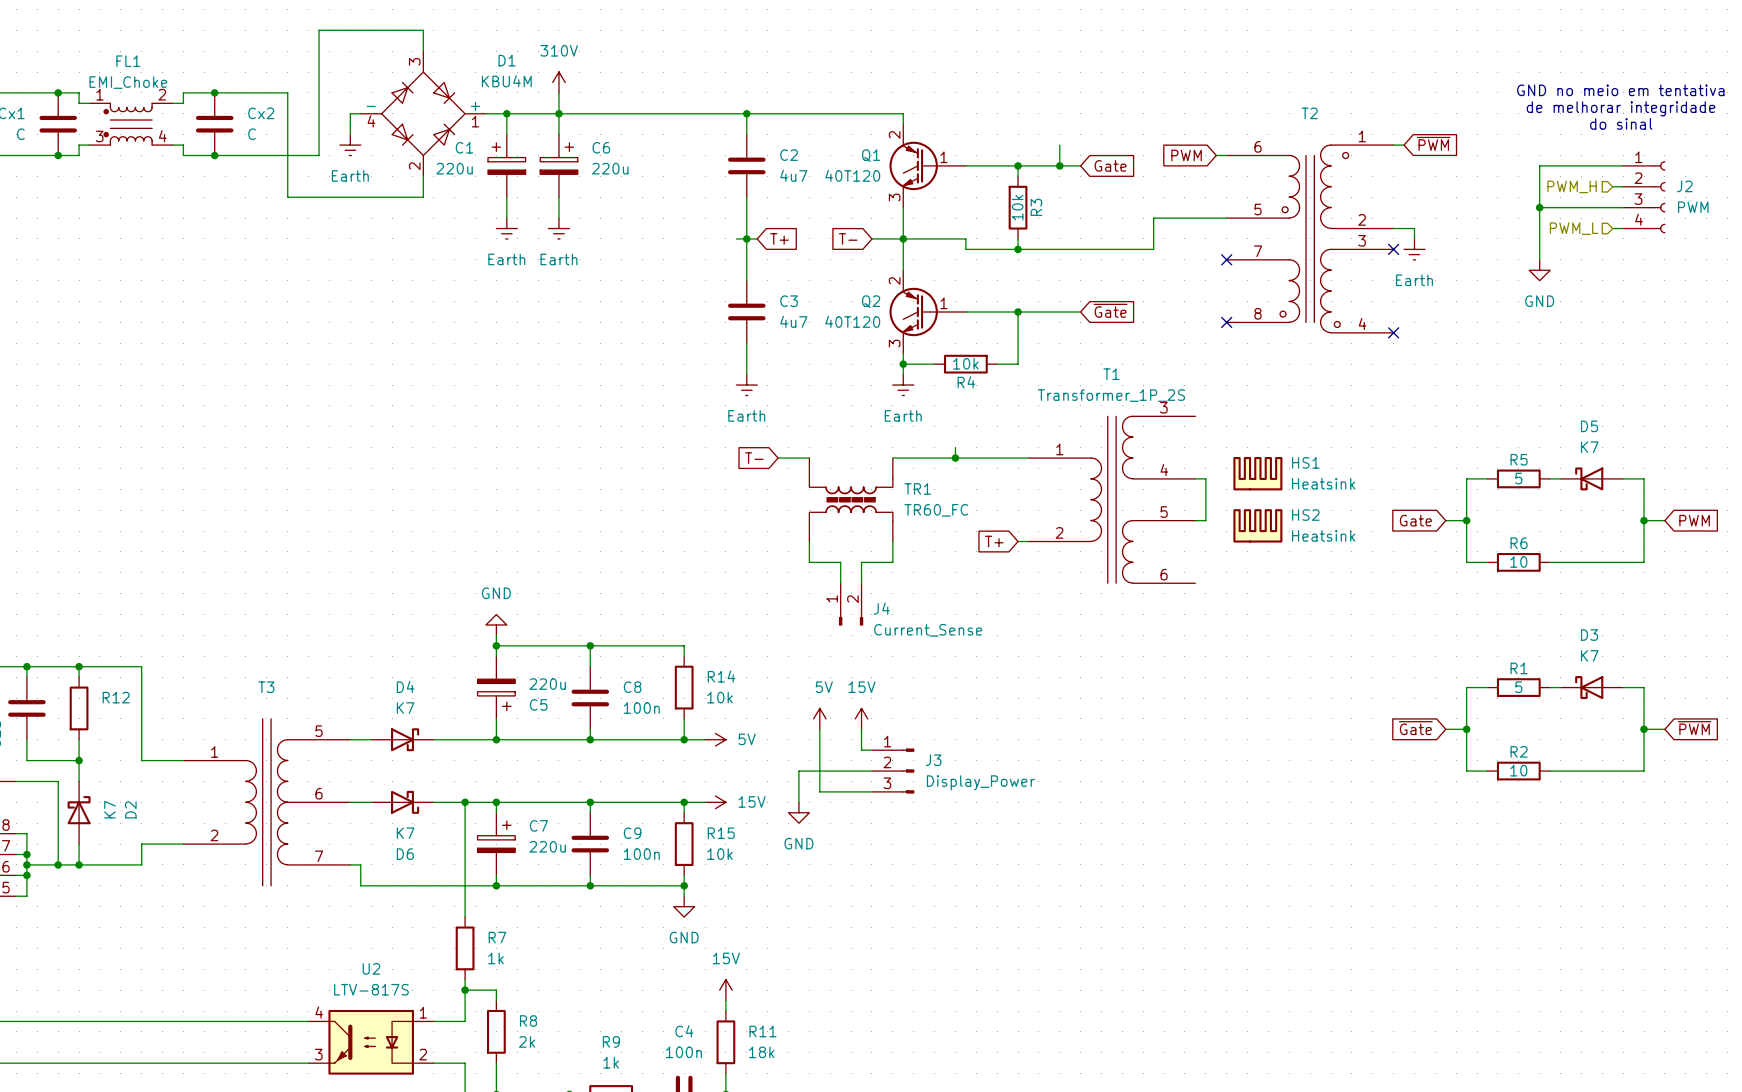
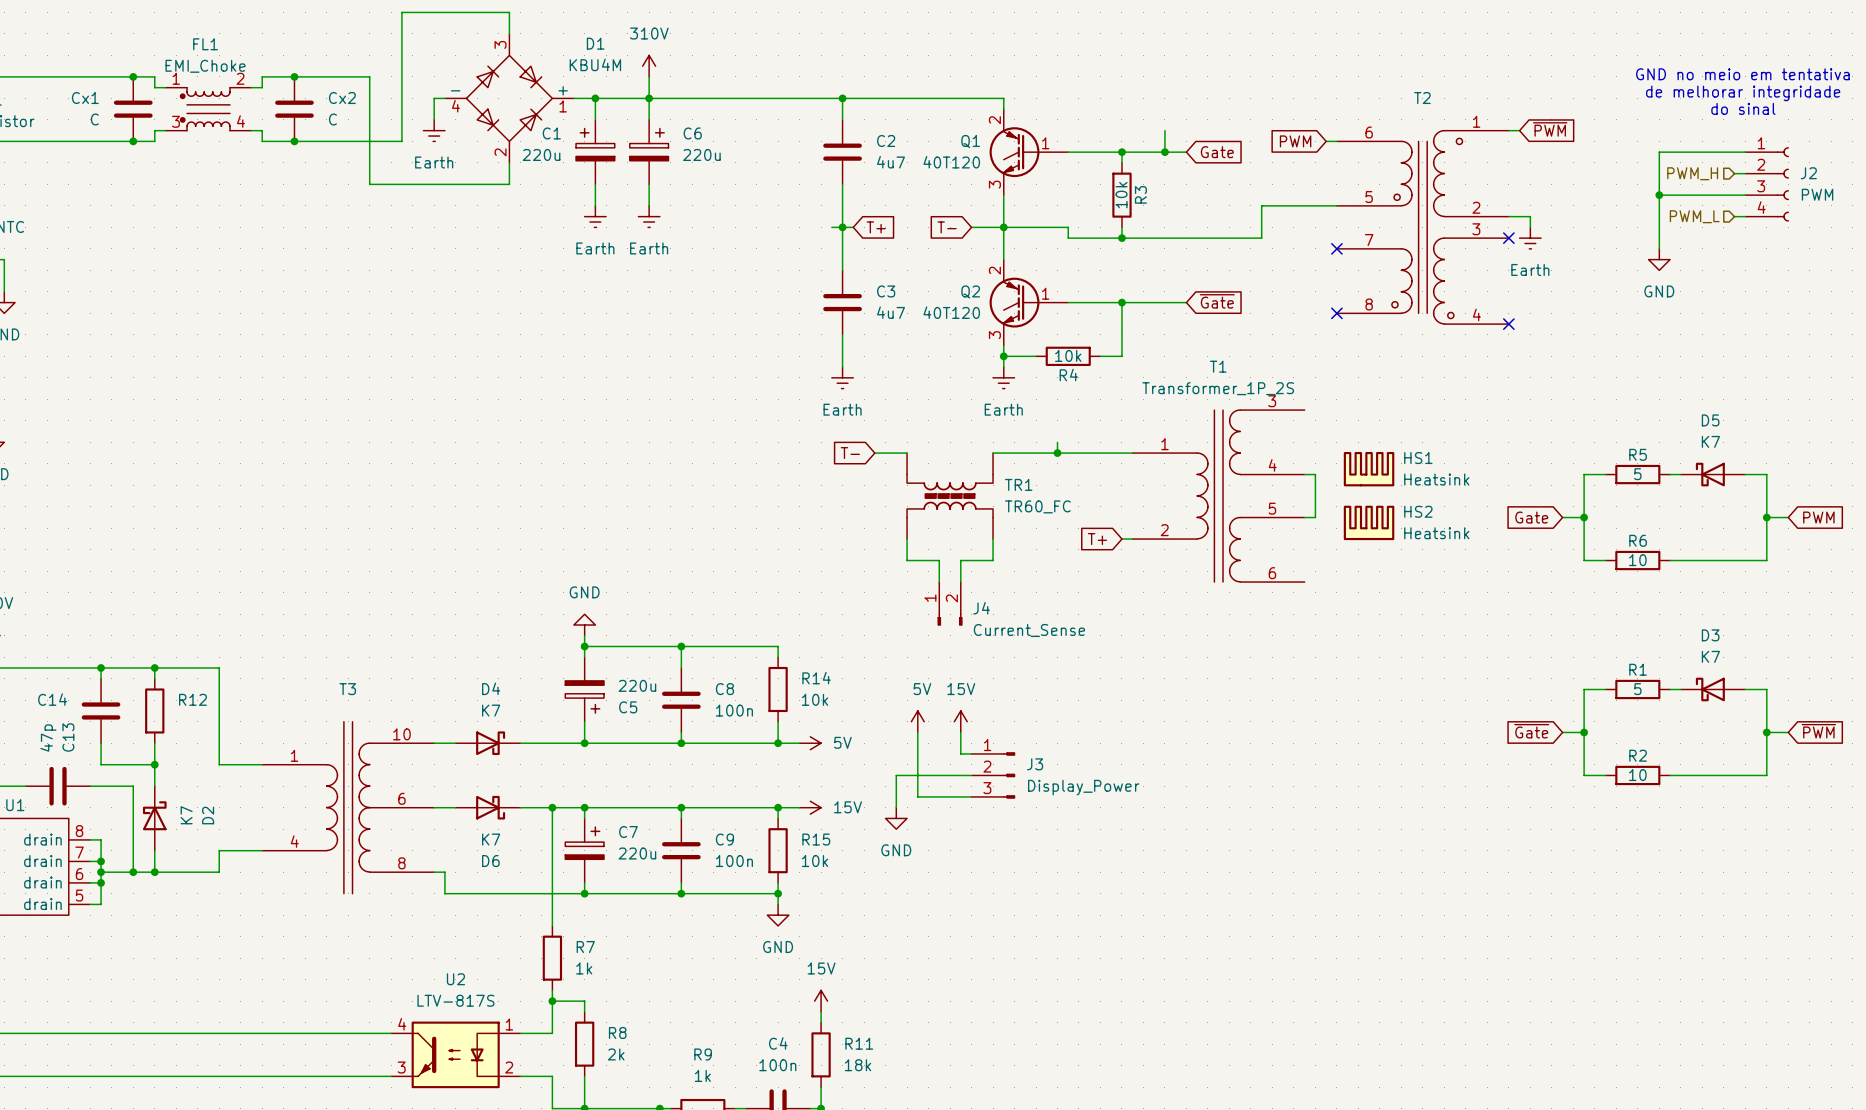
T3 pin number: 5 (319, 731) -> 10 (401, 734)
T3 pin number: 2 (214, 835) -> 4 (294, 841)
T3 pin number: 7 (319, 856) -> 8 (401, 863)

